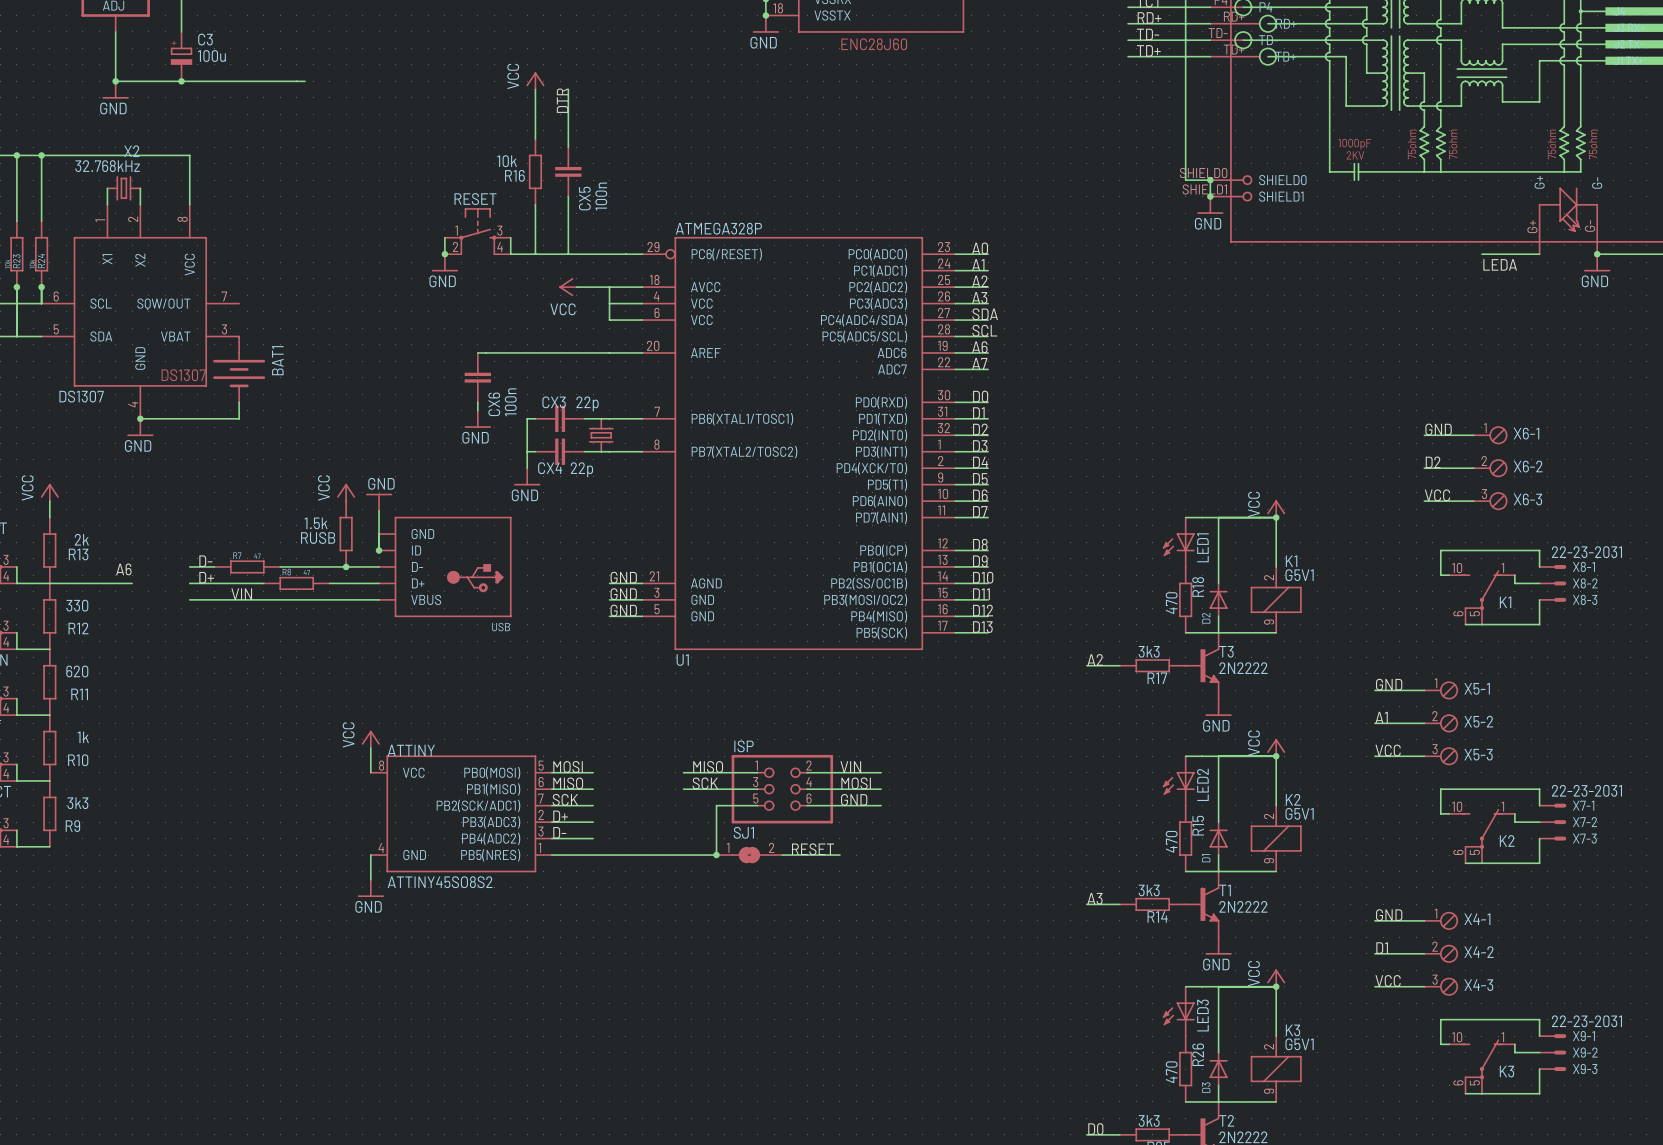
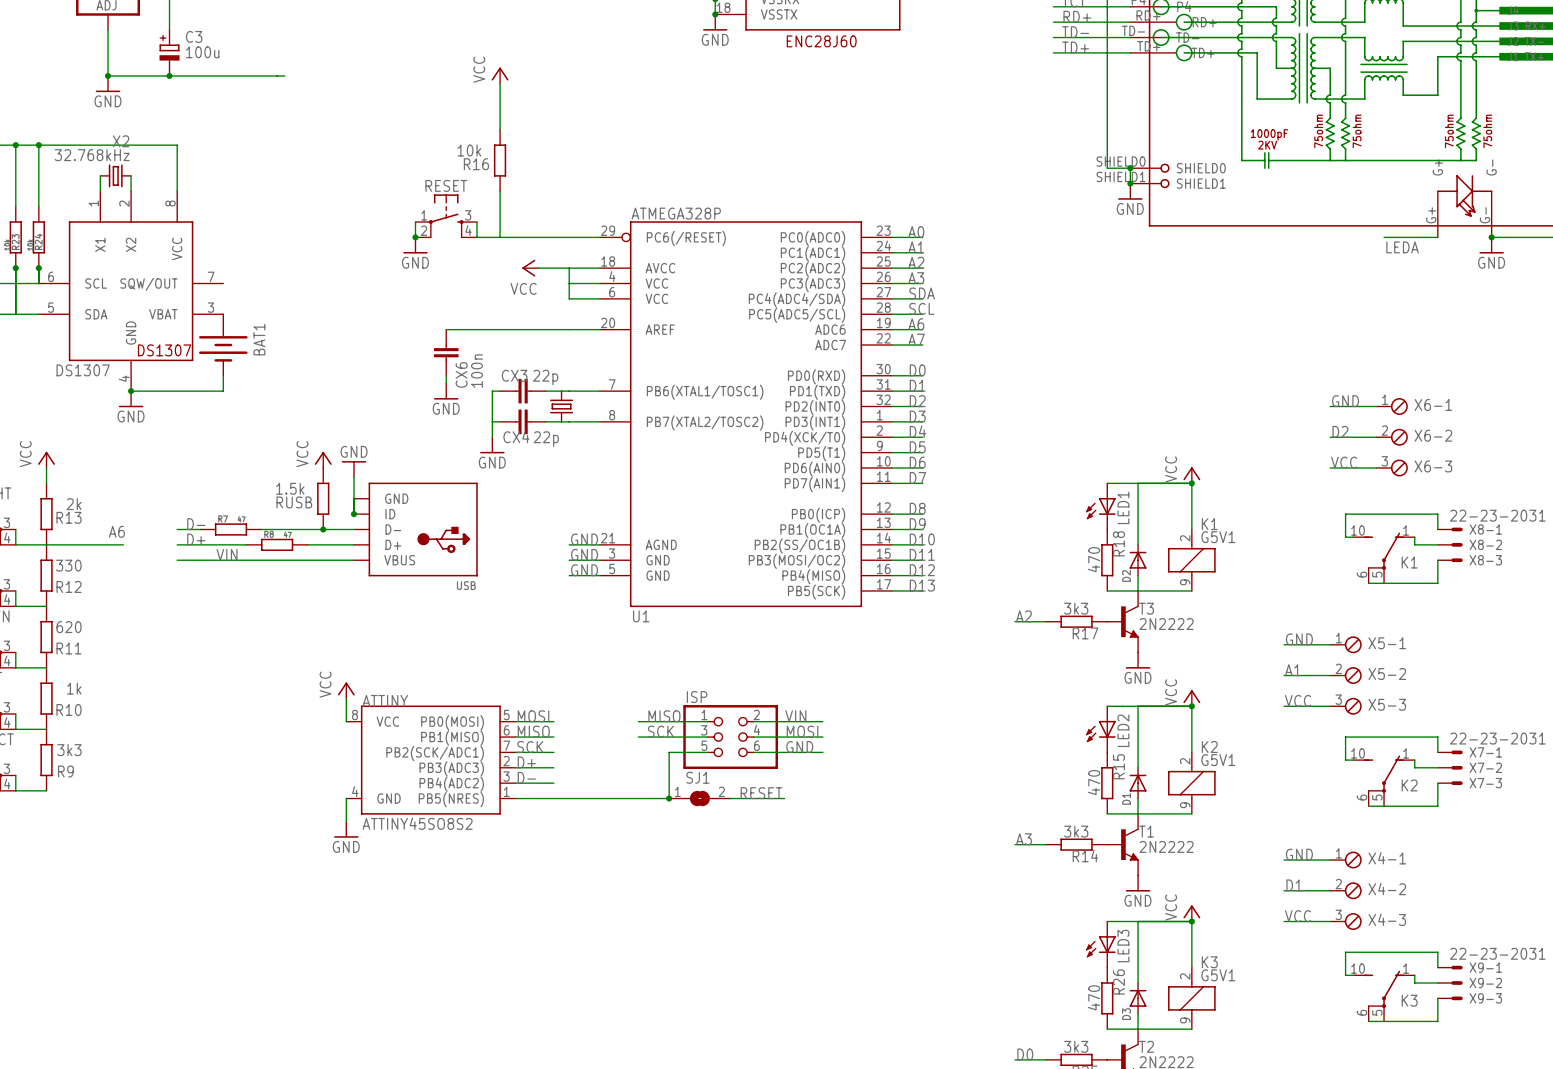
wire: (568, 89) (568, 147) -> none
label: DTR (562, 100) -> none
CX5: 100n (568, 171) -> none
wire: (568, 196) (568, 254) -> none

